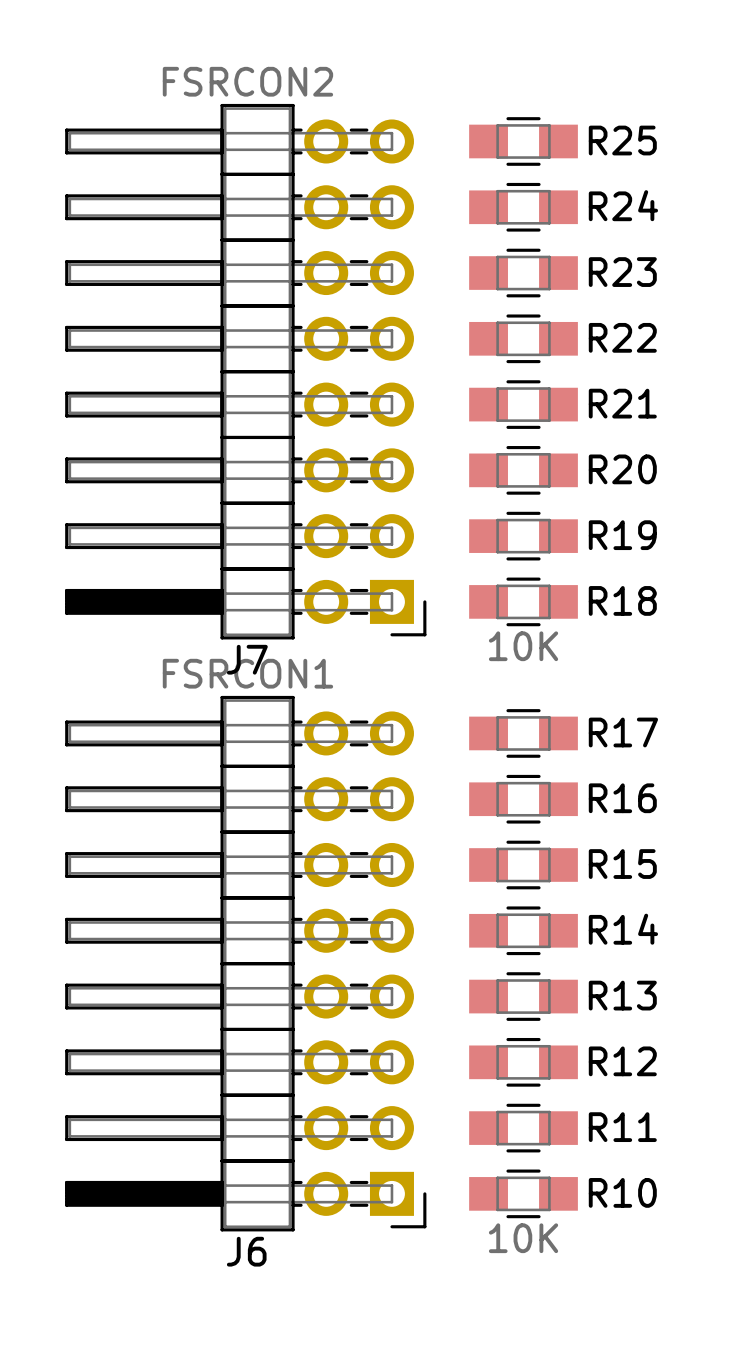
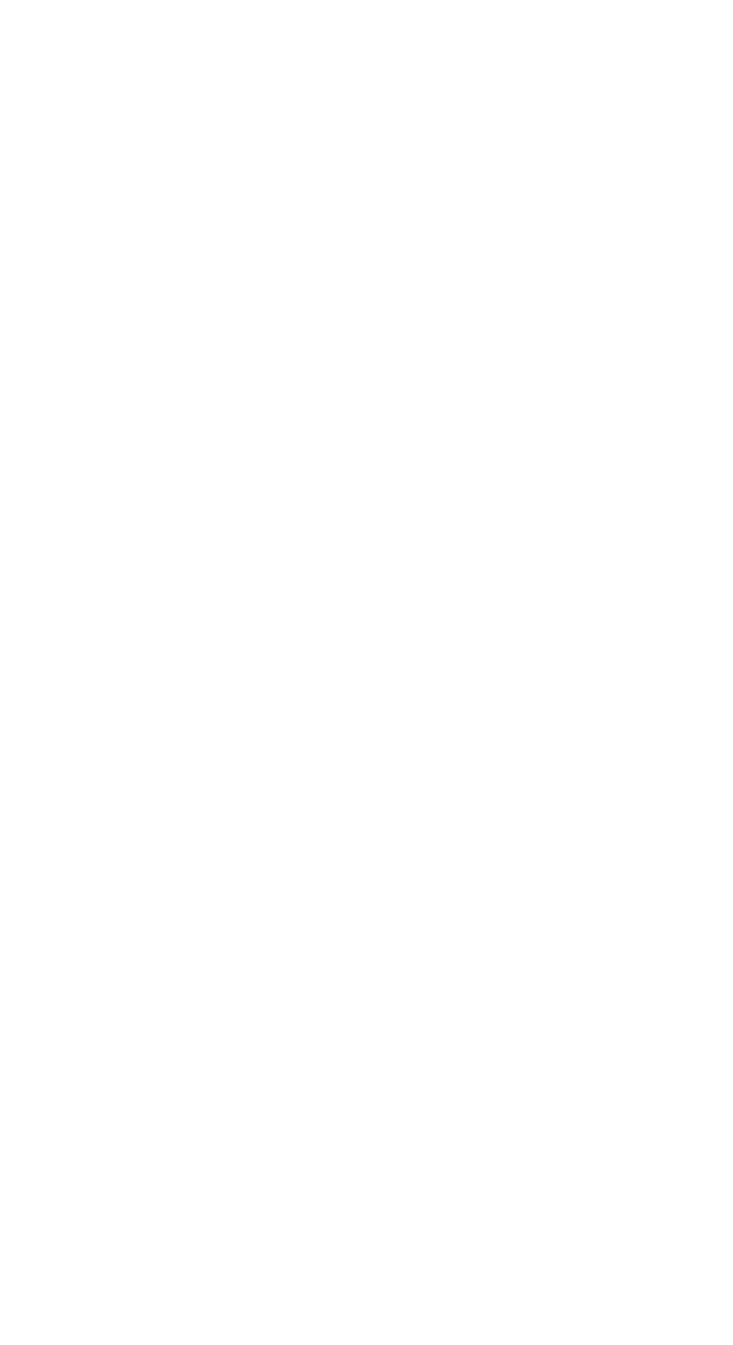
R25: (523, 141) -> none
R24: (523, 207) -> none
R23: (523, 273) -> none
R22: (523, 338) -> none
J7: FSRCON2 (245, 371) -> none
R21: (523, 404) -> none
R20: (523, 470) -> none
R19: (523, 536) -> none
R18: 10K (523, 601) -> none
R17: (523, 733) -> none
R16: (523, 799) -> none
R15: (523, 865) -> none
R14: (523, 930) -> none
J6: FSRCON1 (245, 963) -> none
R13: (523, 996) -> none
R12: (523, 1062) -> none
R11: (523, 1128) -> none
R10: 10K (523, 1193) -> none

